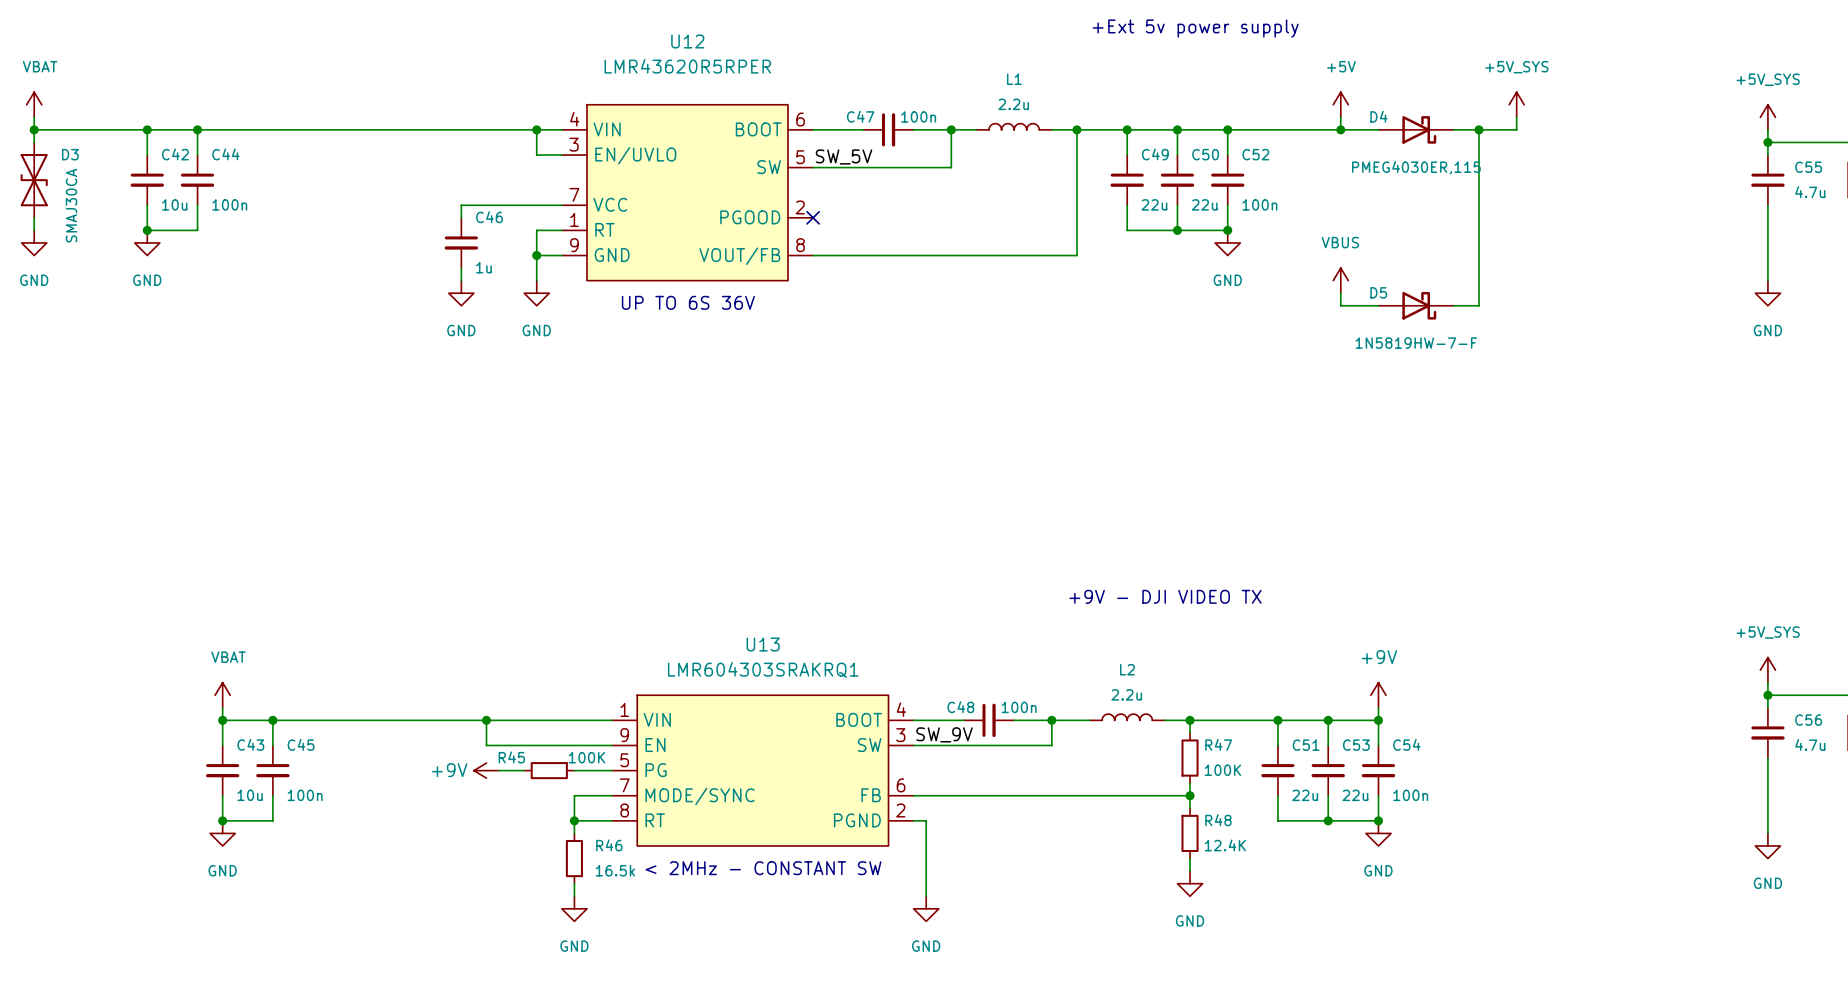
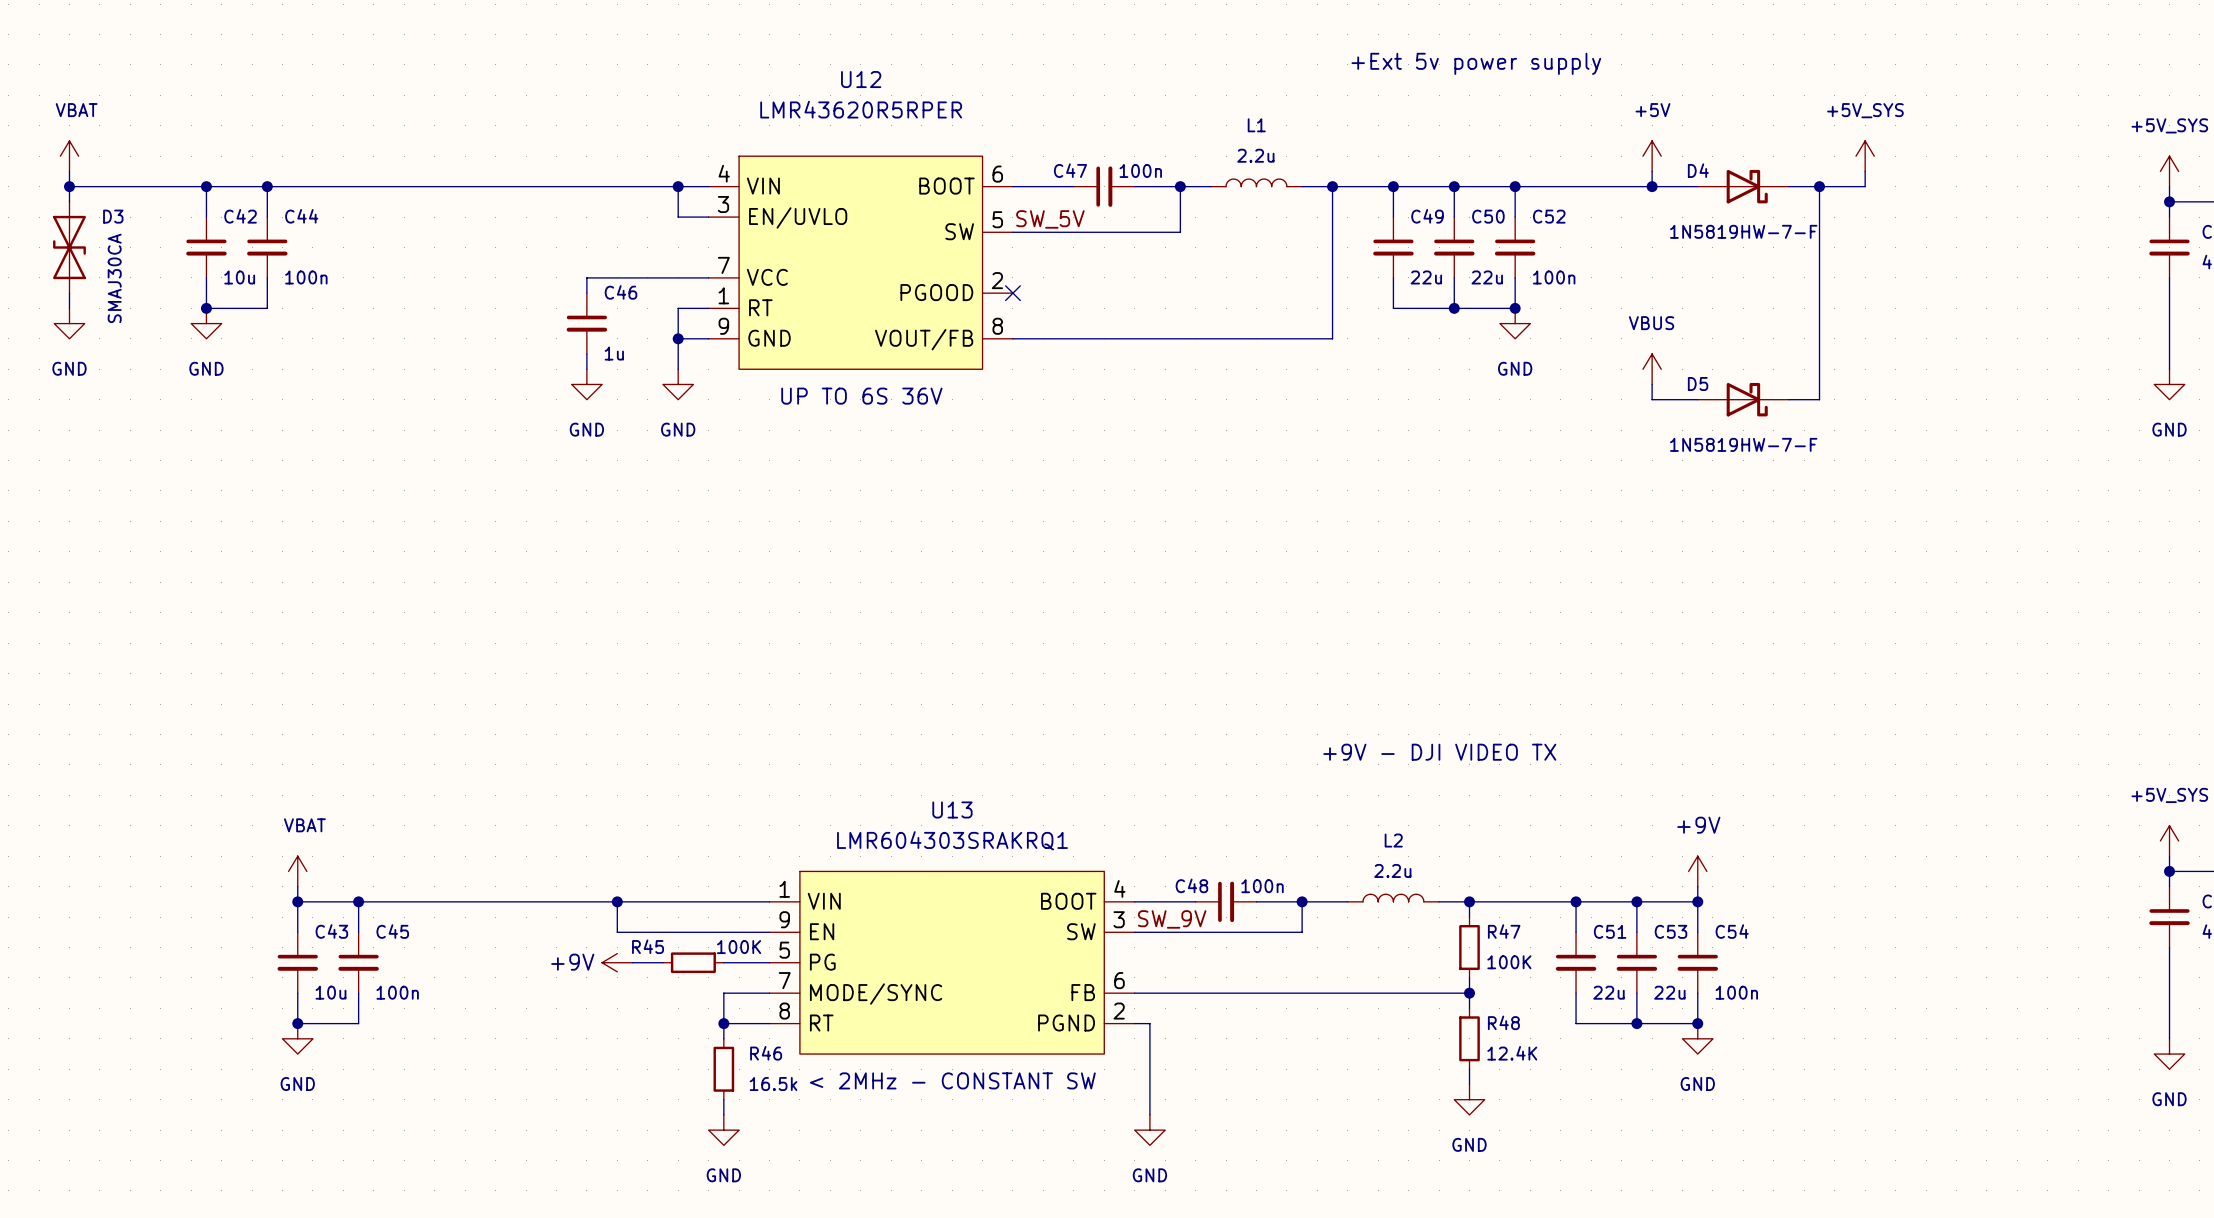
D4 value: PMEG4030ER,115 (1416, 167) -> 1N5819HW-7-F (1743, 231)

